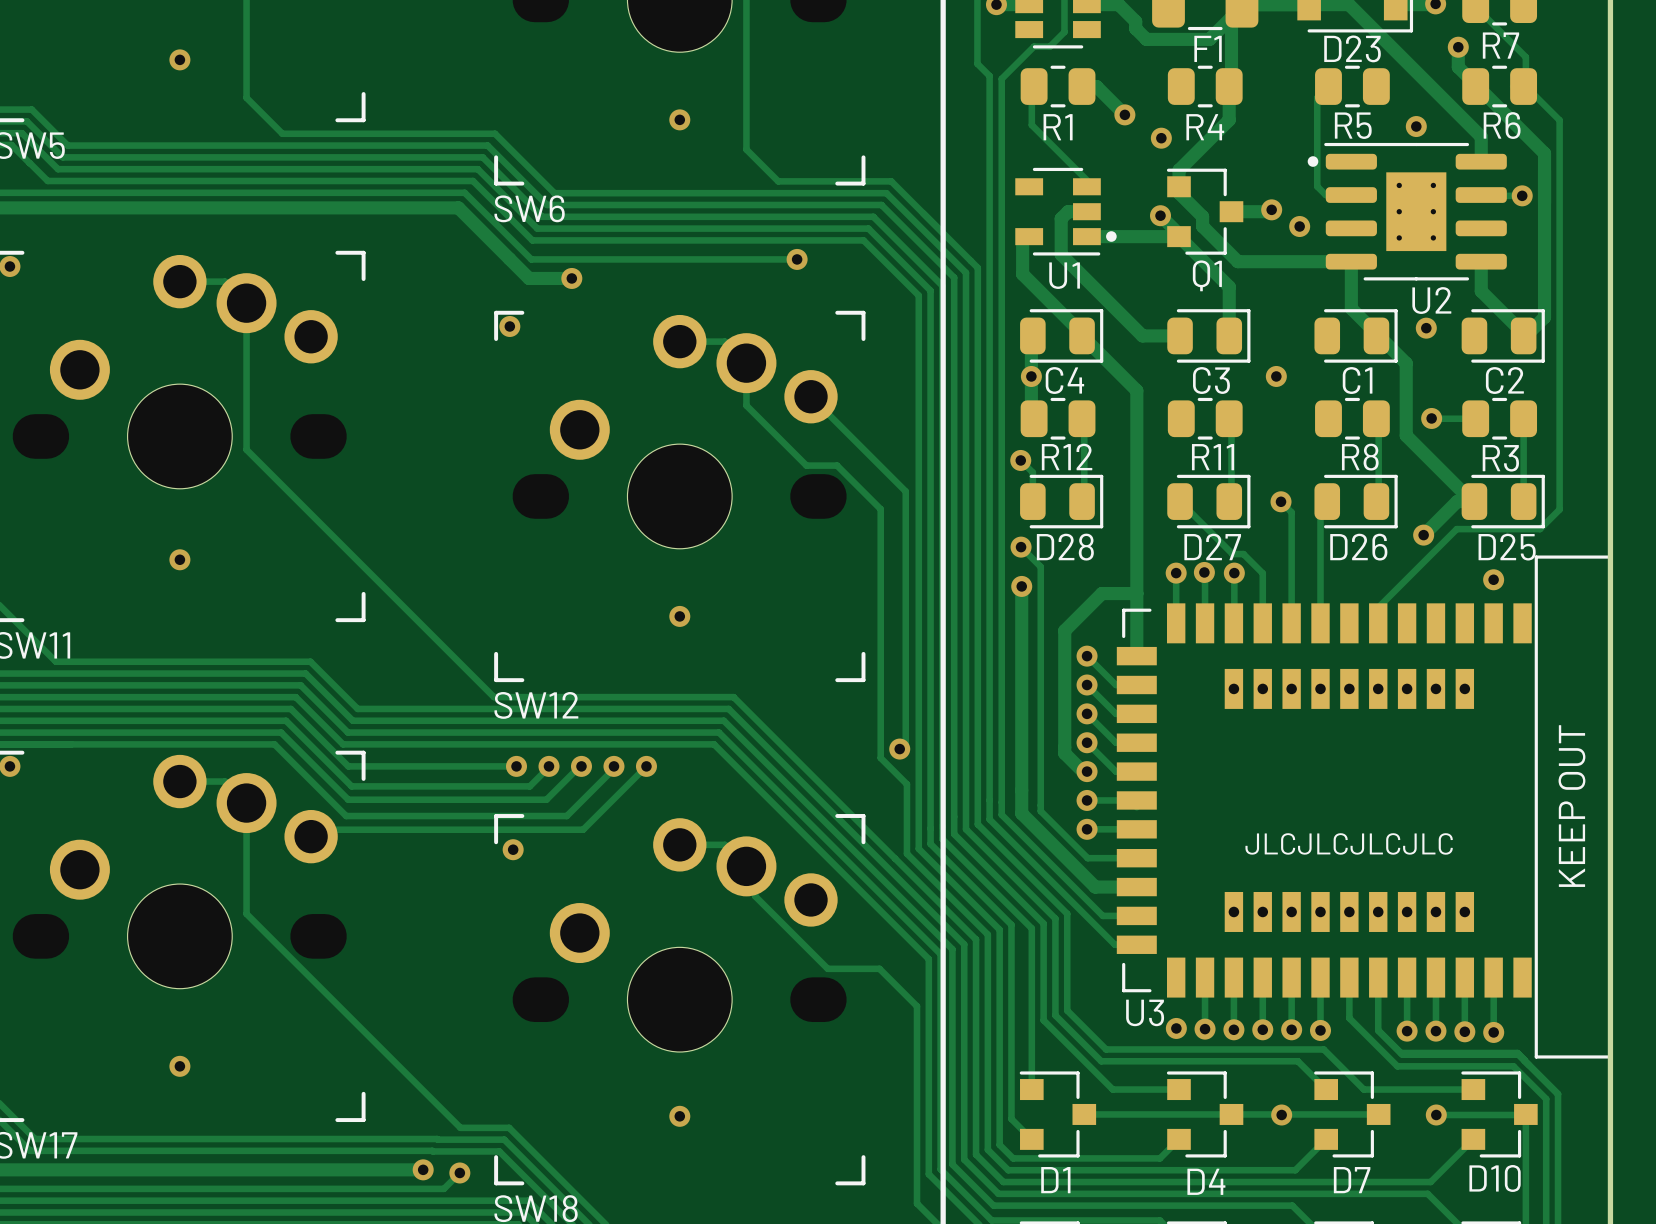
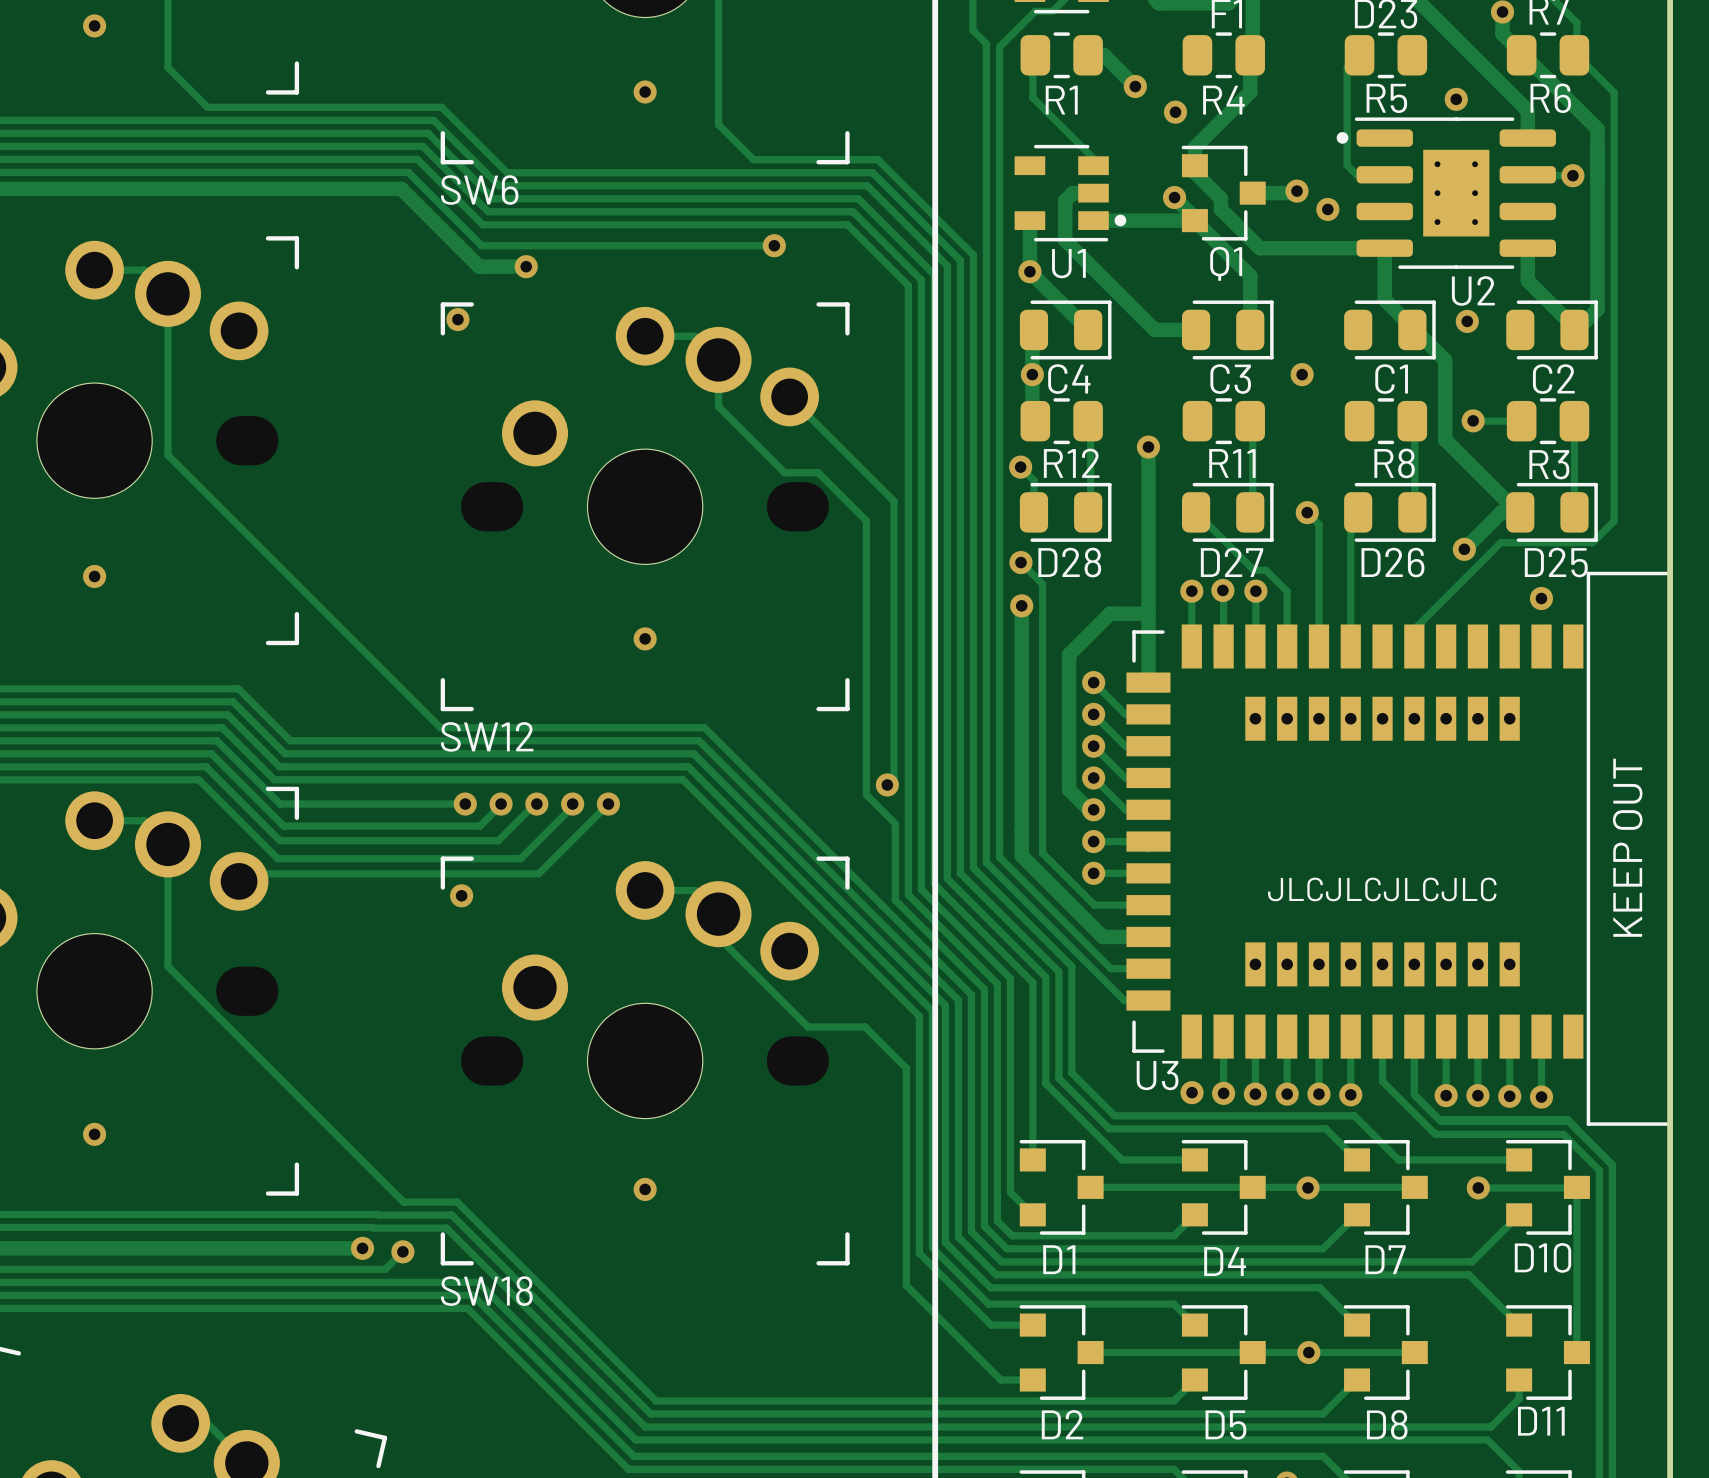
track: (1022, 236) (1022, 274) (1084, 335) -> none
via: none -> (1029, 271)
track: (1082, 335) (1136, 390) (1136, 442) -> (1088, 329) (1029, 271) (1029, 220)
via: none -> (1148, 447)

